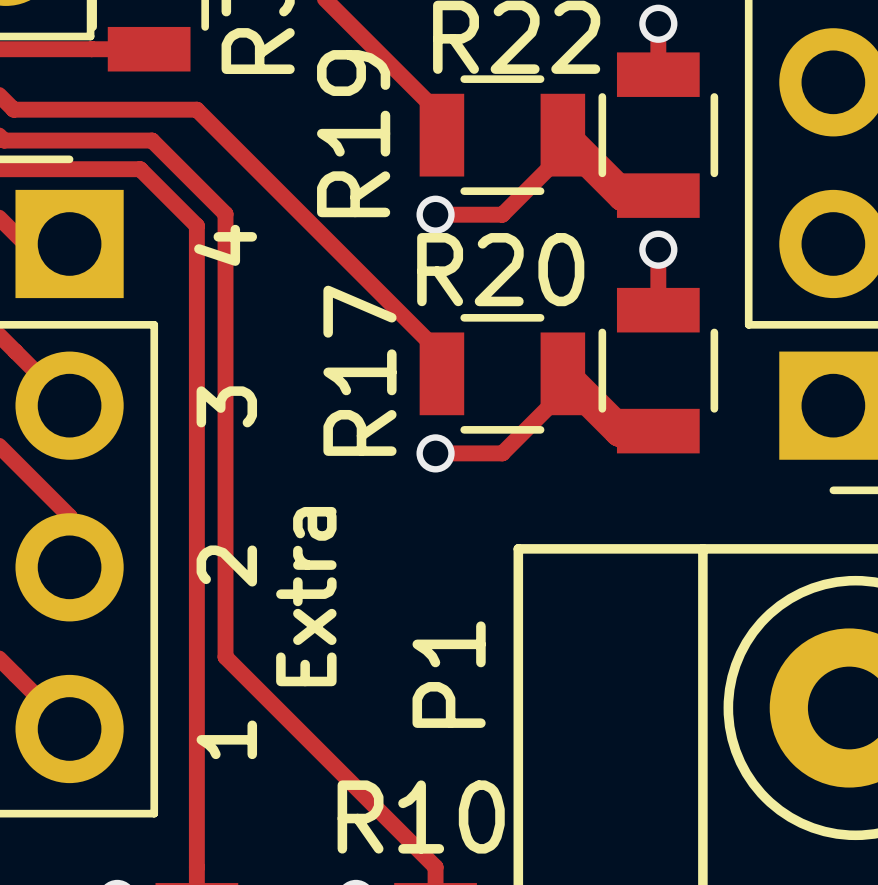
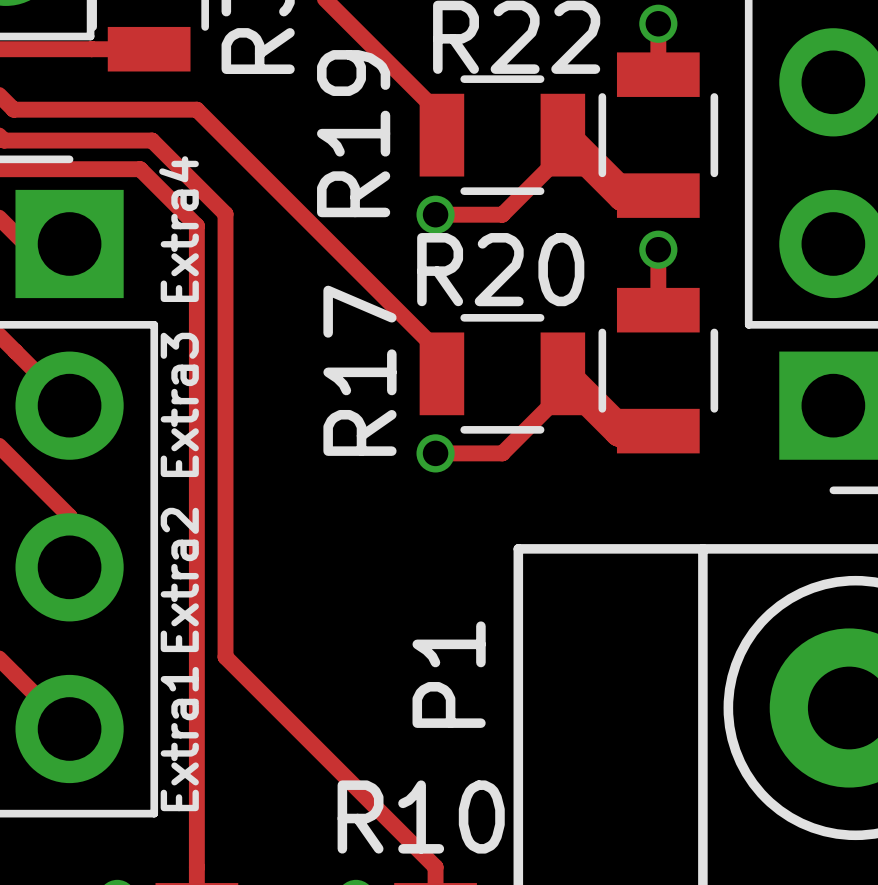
text: 4 (225, 245) -> Extra4 (179, 229)
text: 3 (226, 406) -> Extra3 (179, 404)
text: 2 (226, 565) -> Extra2 (179, 579)
text: Extra (306, 596) -> none
text: 1 (226, 739) -> Extra1 (179, 739)

